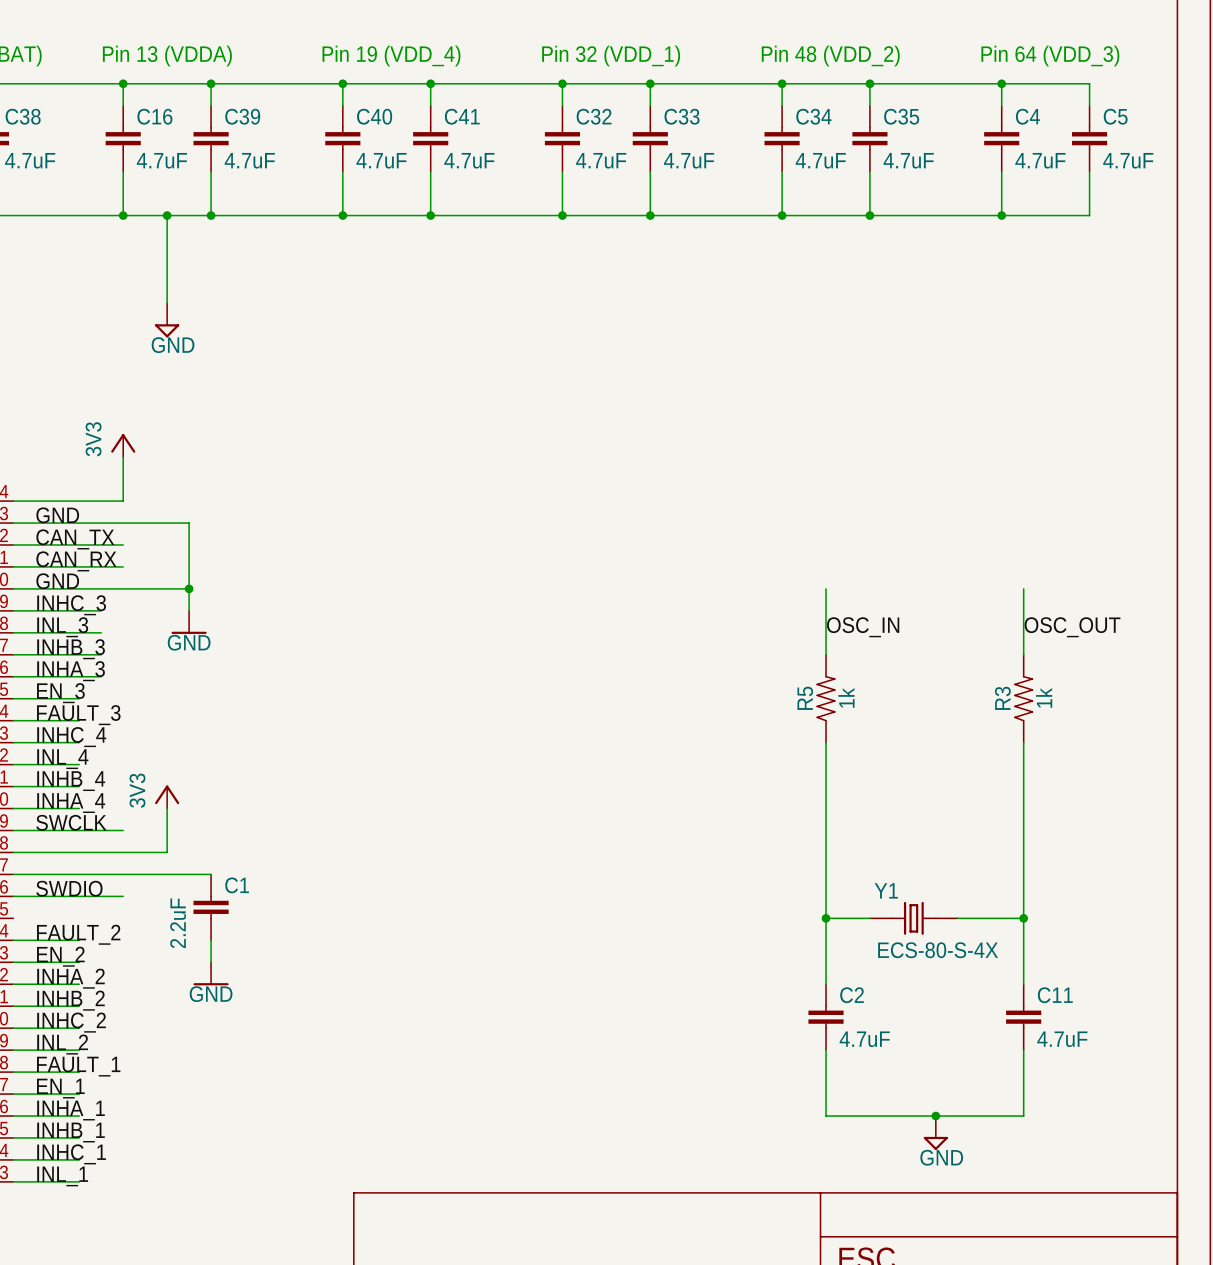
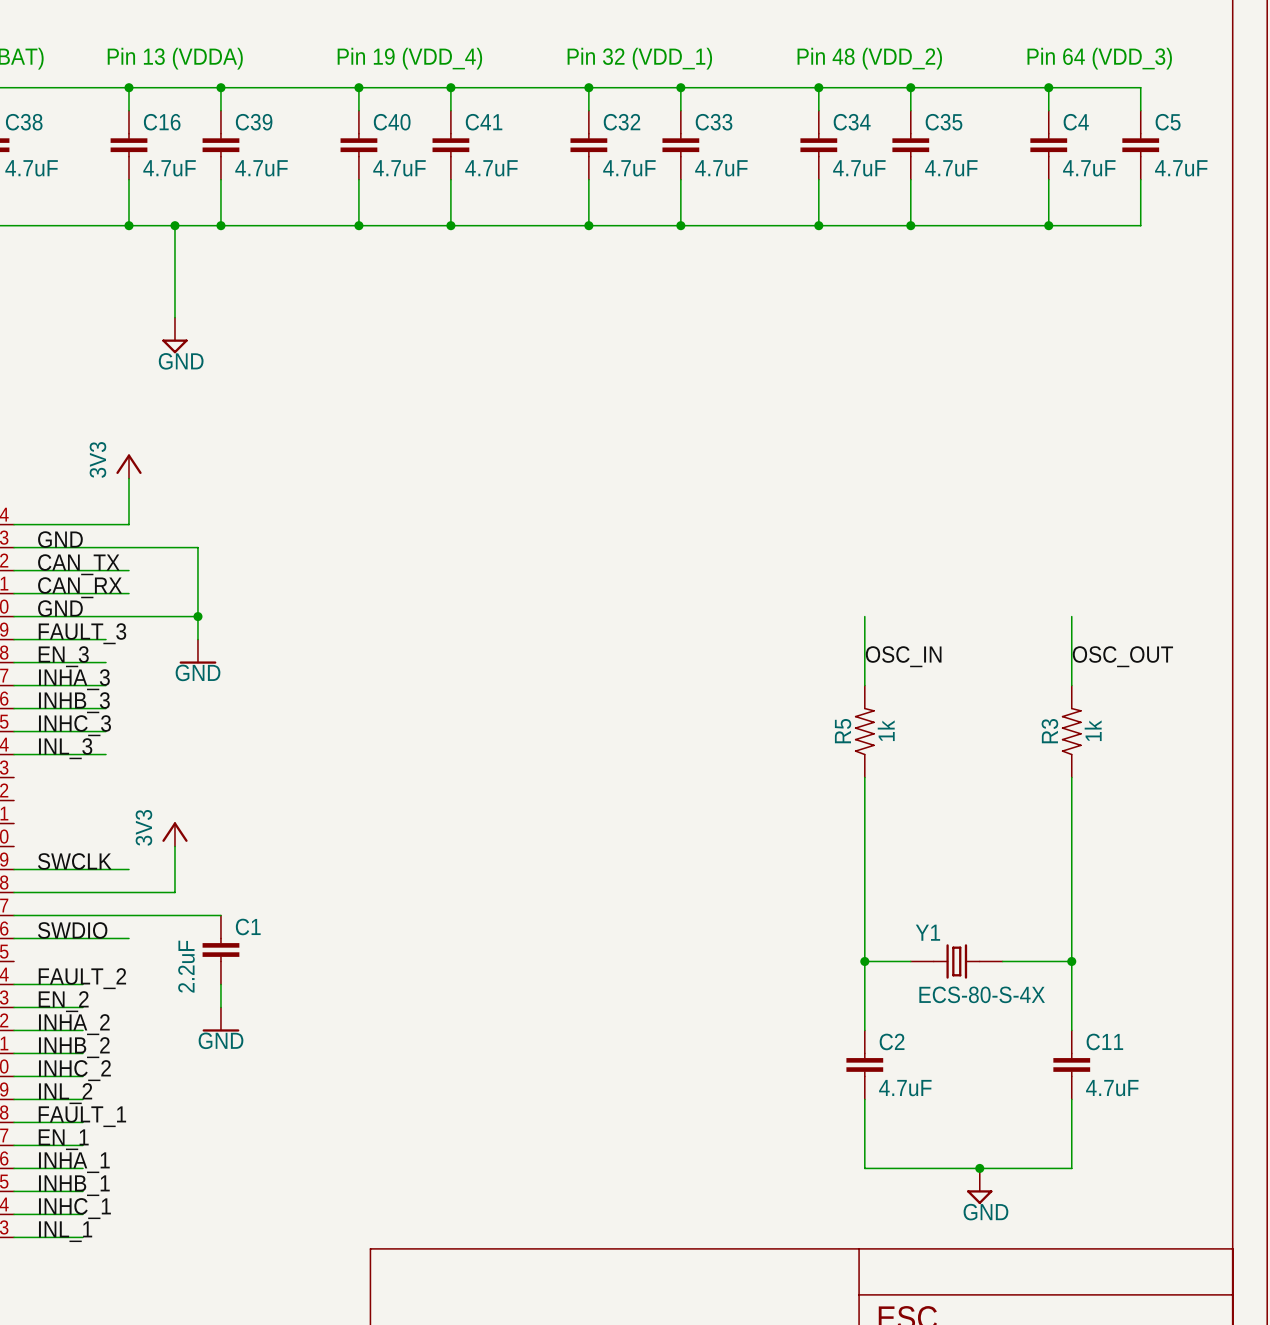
label: INHC_3 (71, 605) -> FAULT_3 (82, 633)
label: INL_3 (62, 627) -> EN_3 (63, 656)
label: INHB_3 (71, 649) -> INHA_3 (74, 679)
label: INHA_3 (71, 671) -> INHB_3 (74, 702)
label: EN_3 (60, 693) -> INHC_3 (74, 725)
wire: none -> (83, 731) (106, 731)
label: FAULT_3 (78, 715) -> INL_3 (65, 748)
wire: none -> (83, 754) (106, 754)
label: INHC_4 (71, 737) -> none
wire: (13, 742) (79, 742) -> none
label: INL_4 (62, 759) -> none
wire: (13, 764) (79, 764) -> none
label: INHB_4 (71, 781) -> none
wire: (13, 786) (79, 786) -> none
label: INHA_4 (71, 803) -> none
wire: (13, 808) (79, 808) -> none

